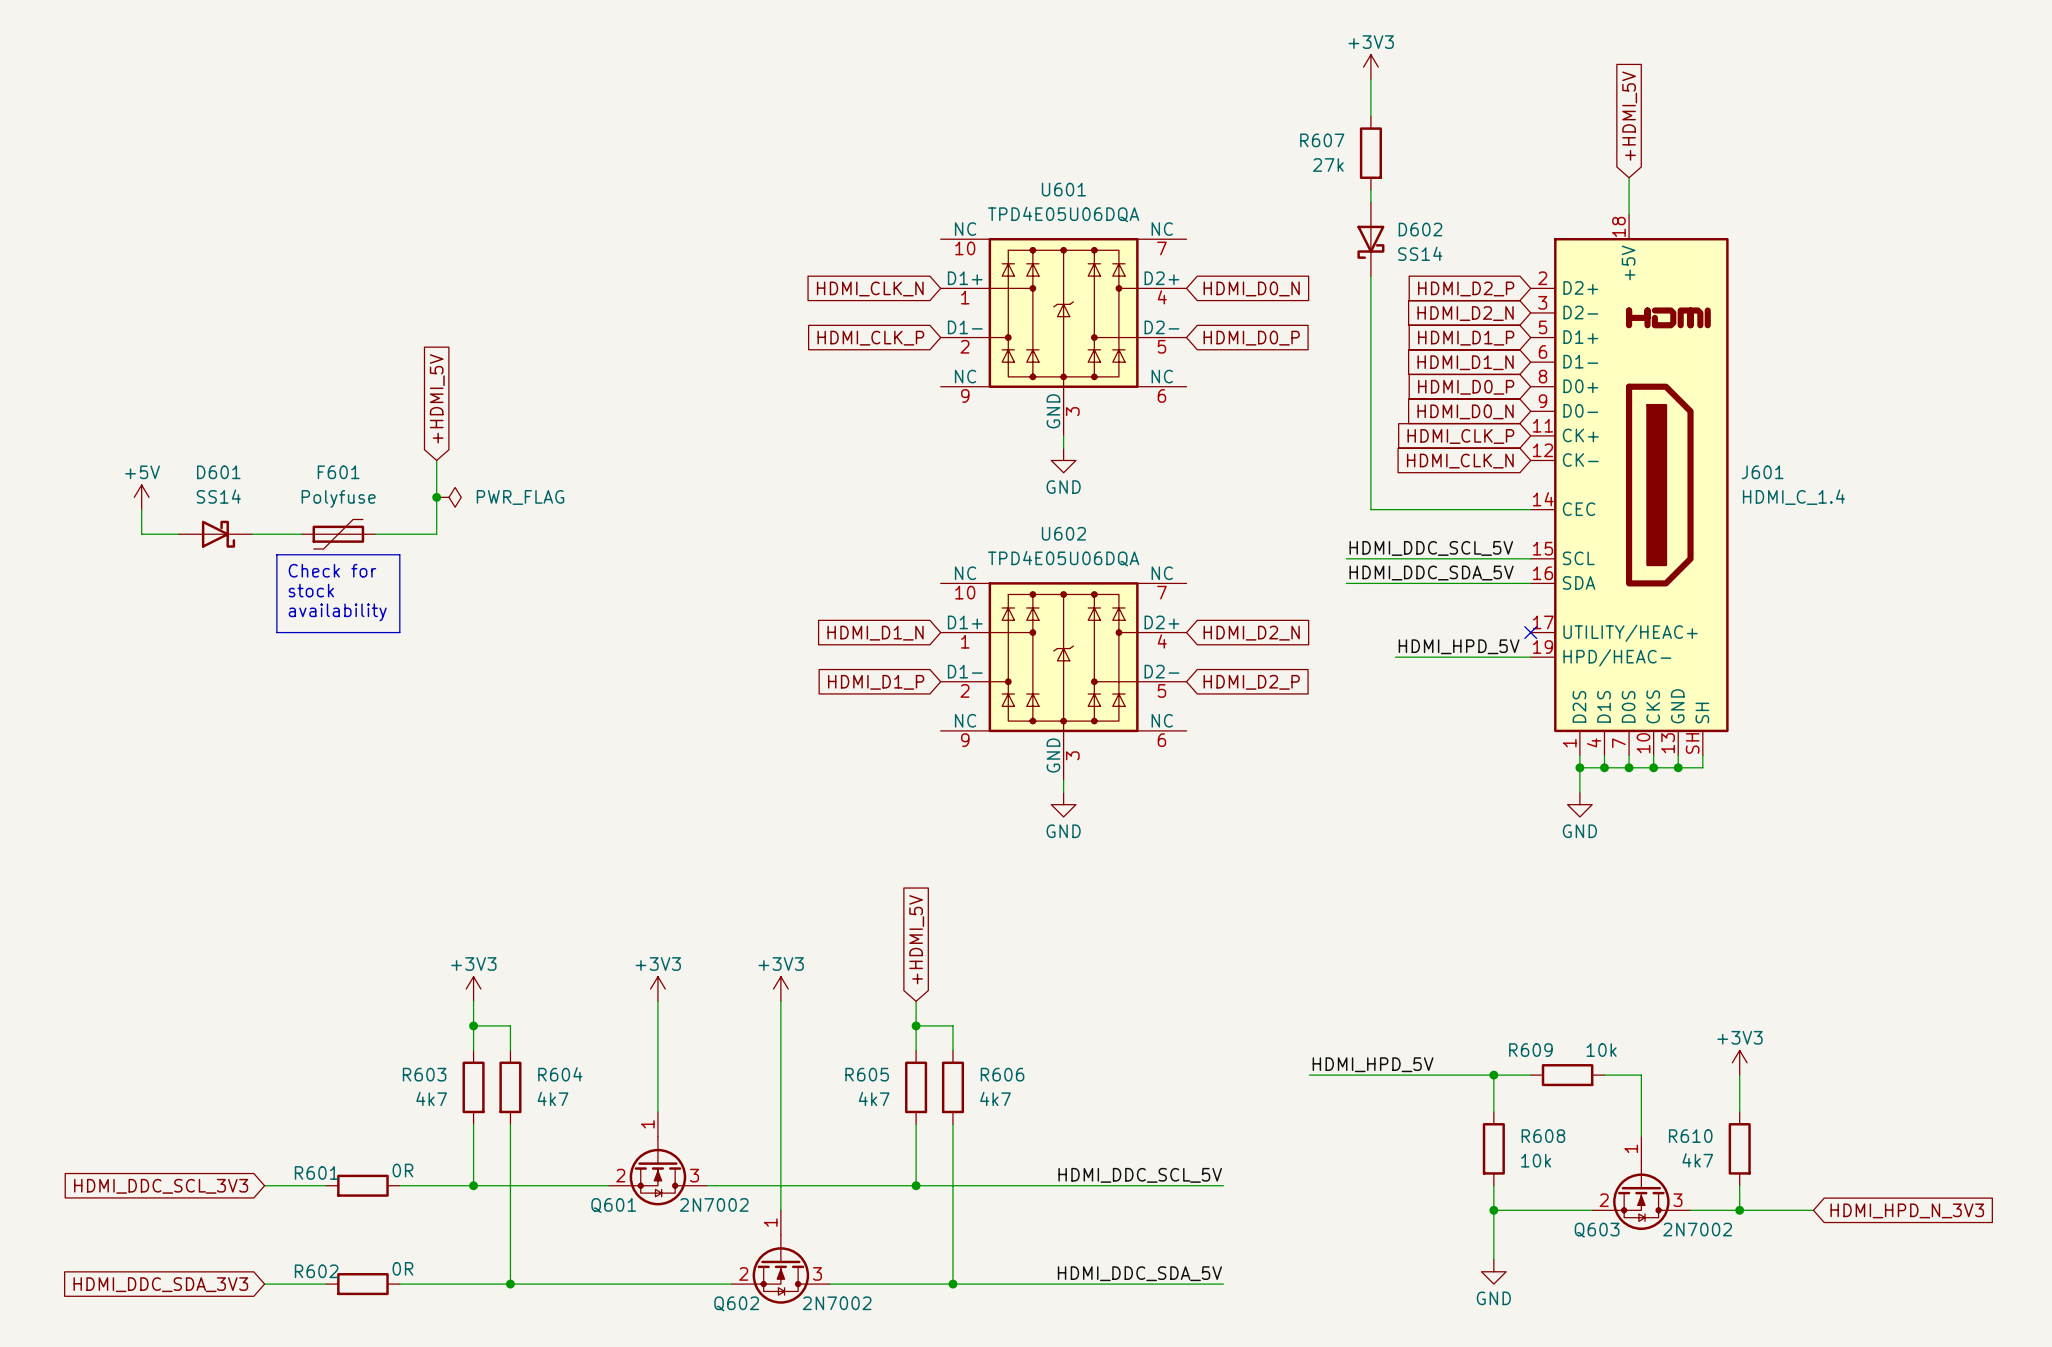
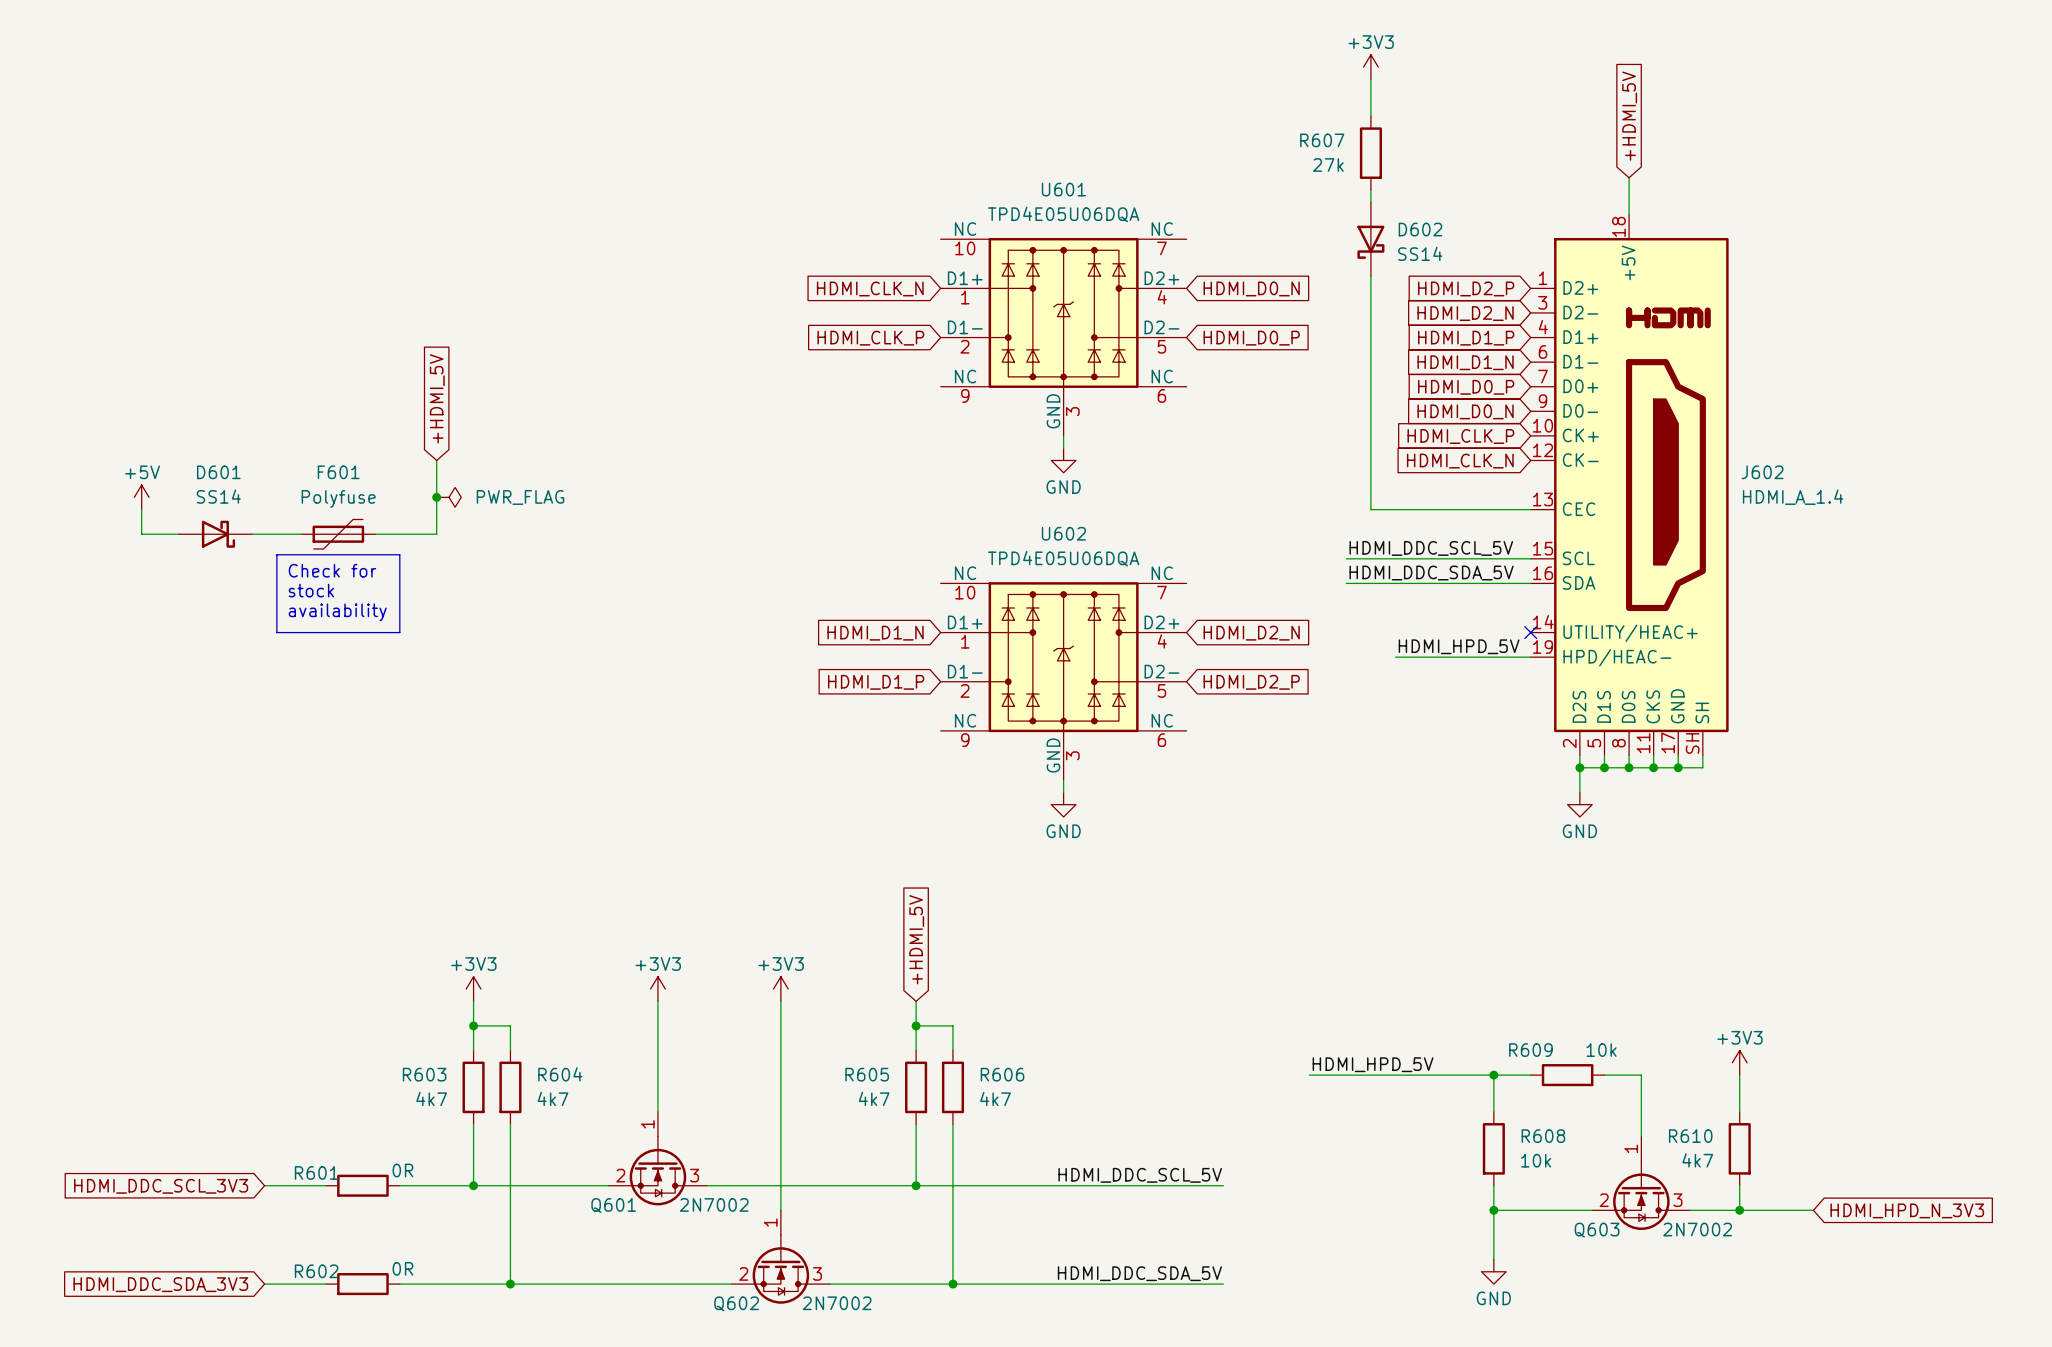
J601: HDMI_C_1.4 (1629, 485) -> none
J602: none -> HDMI_A_1.4 (1629, 485)

